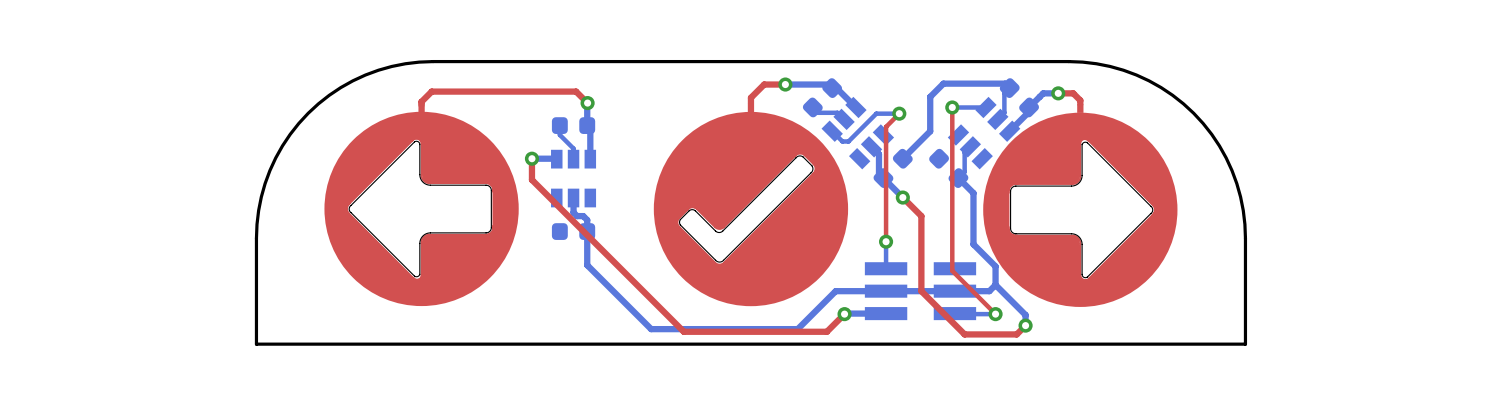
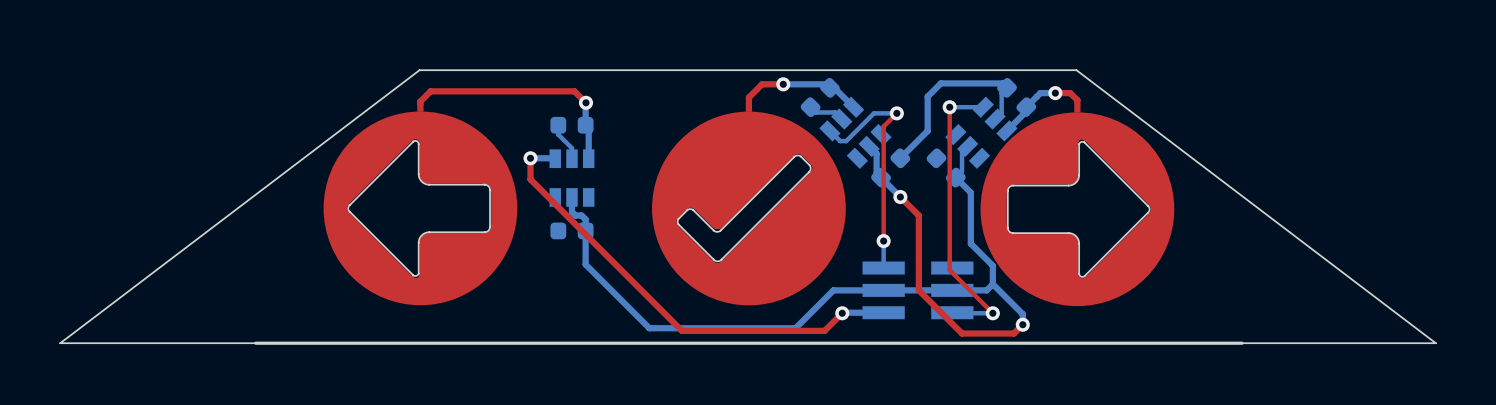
board edge: (256, 344) (256, 238) (258, 210) (269, 170) (282, 145) (298, 123) (318, 103) (352, 80) (391, 66) (433, 61) (1068, 61) (1096, 63) (1123, 70) (1149, 80) (1183, 103) (1211, 134) (1232, 170) (1240, 196) (1244, 224) (1245, 344) -> (255, 343) (60, 343) (419, 70) (1076, 70) (1435, 343) (1242, 343)

